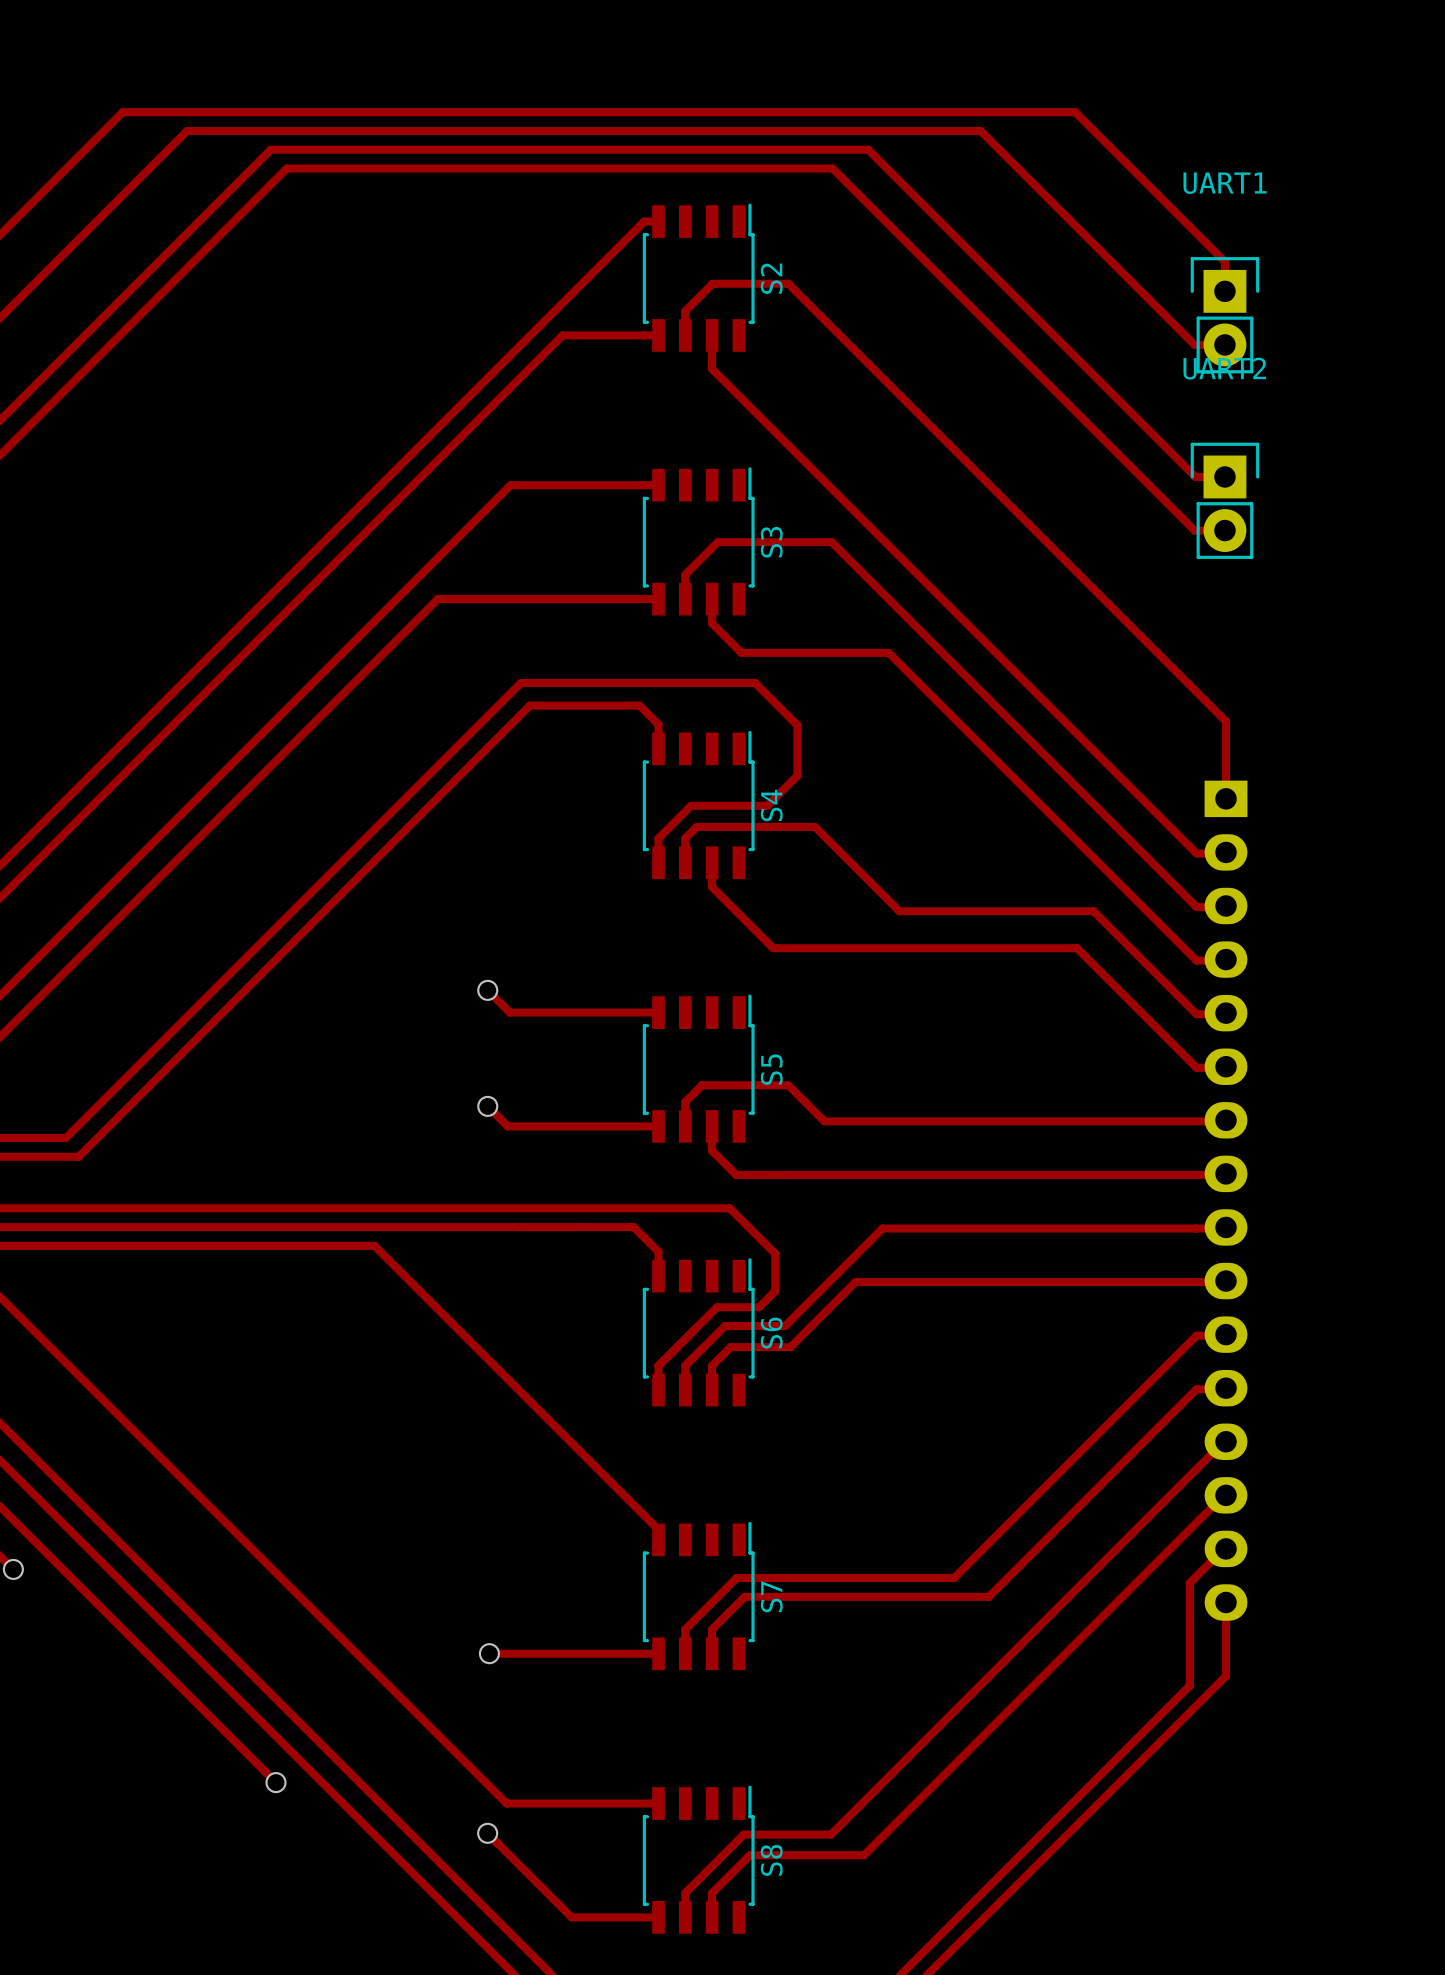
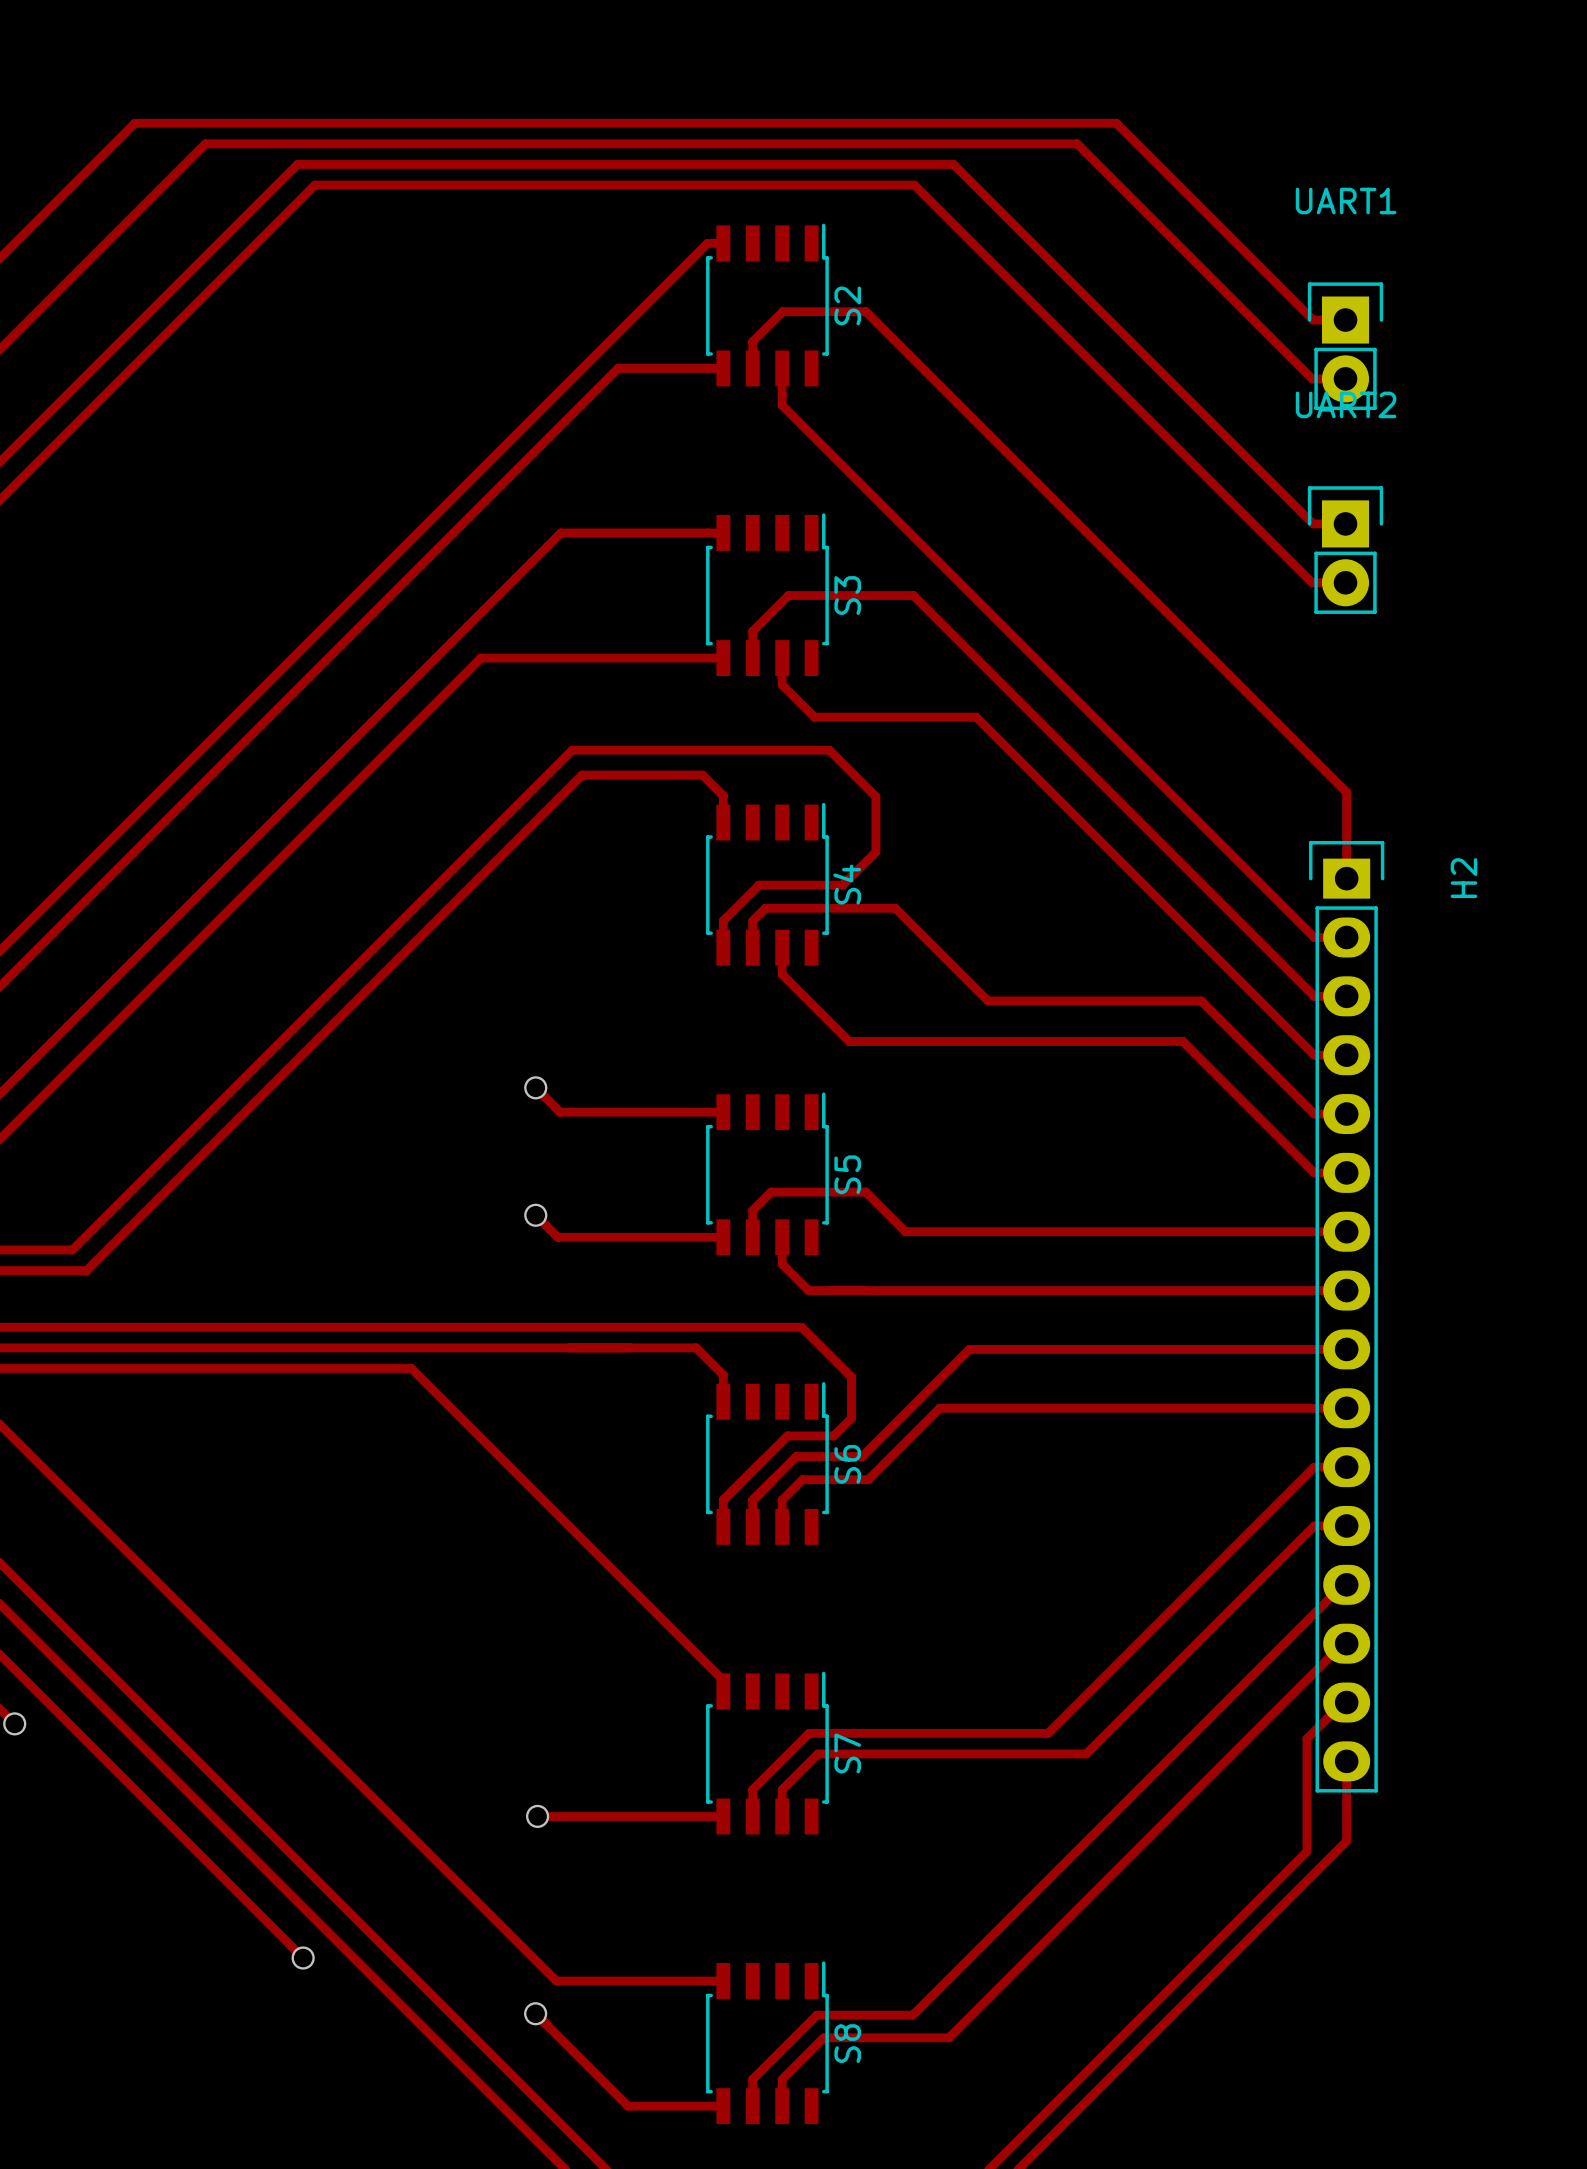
track: (1016, 112) (1075, 112) (1224, 261) (1224, 291) -> (1116, 123) (1313, 320) (1345, 320)
H2 side: bottom (1226, 1200) -> top (1346, 1316)

